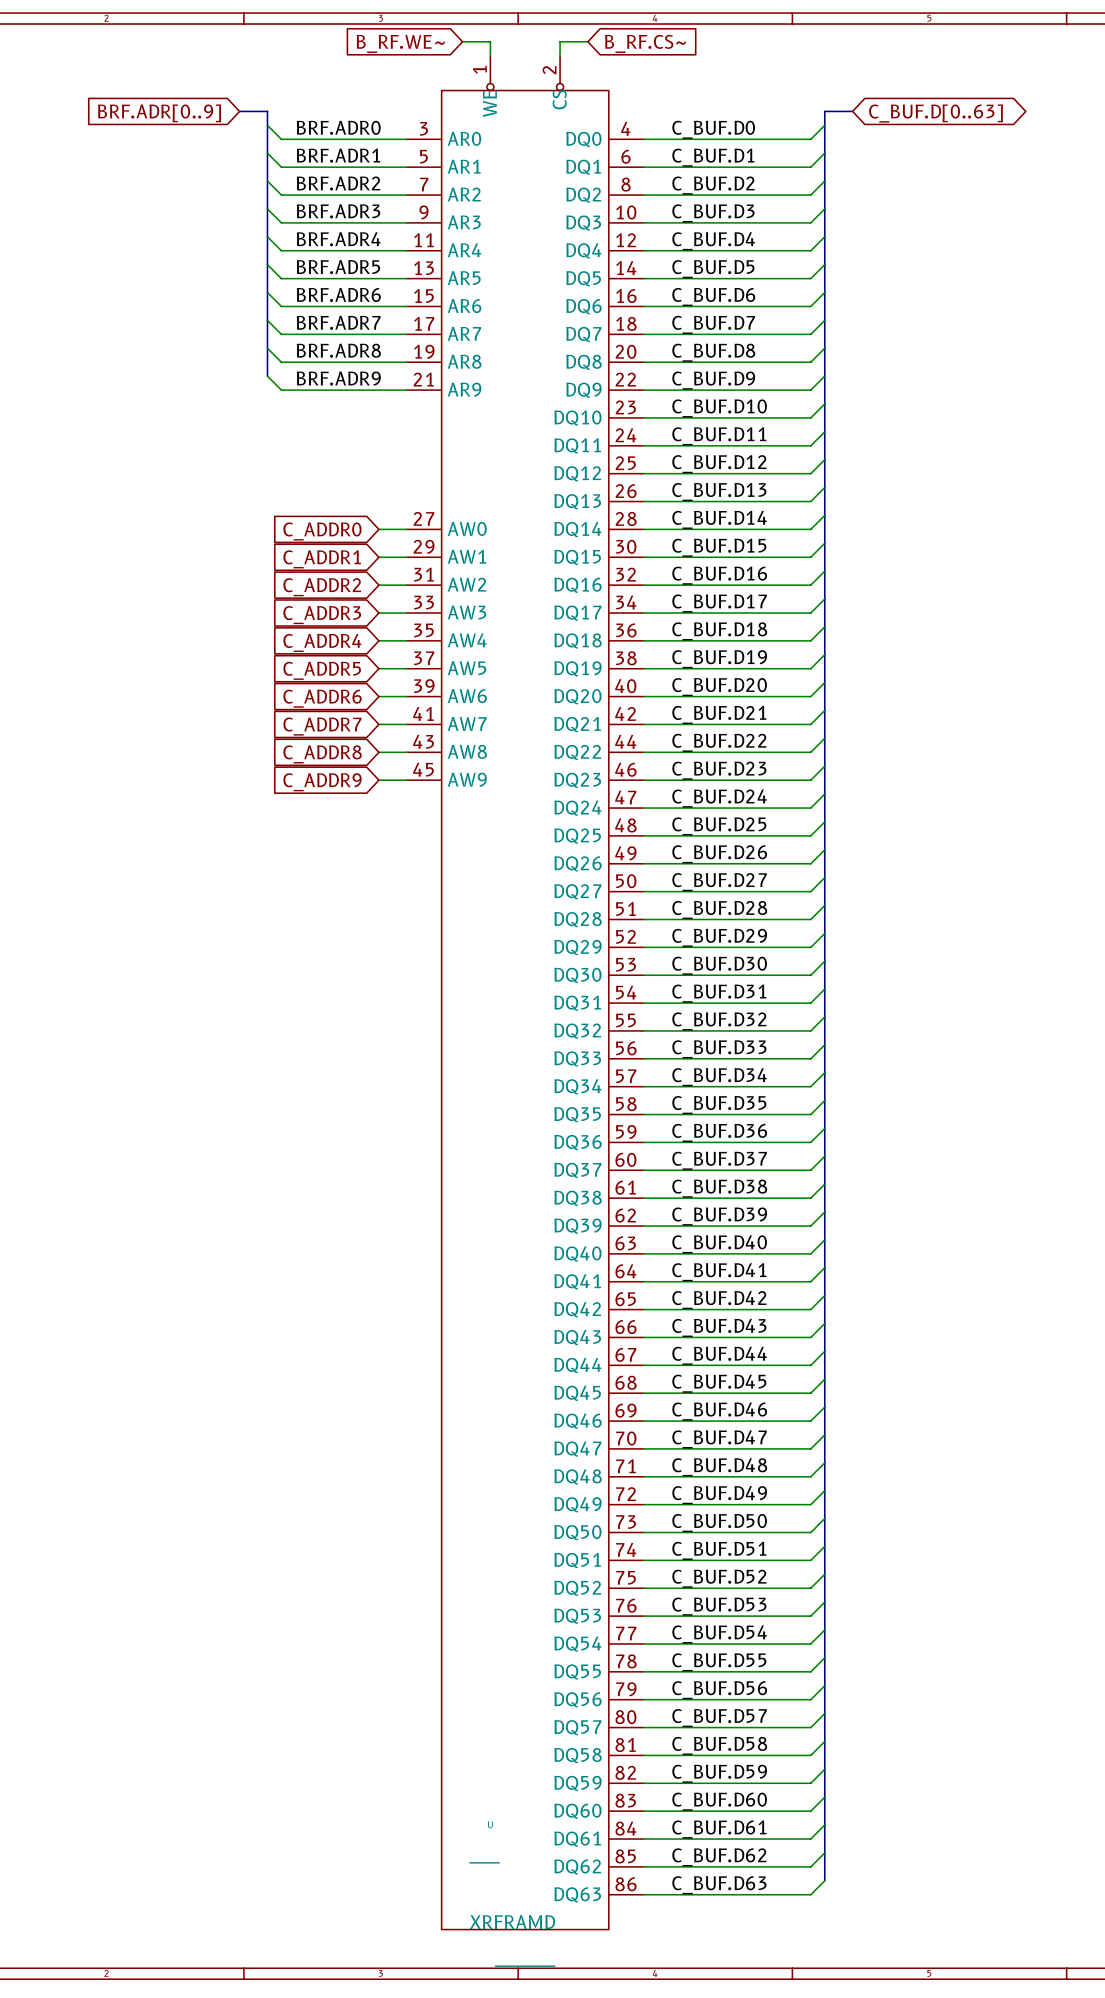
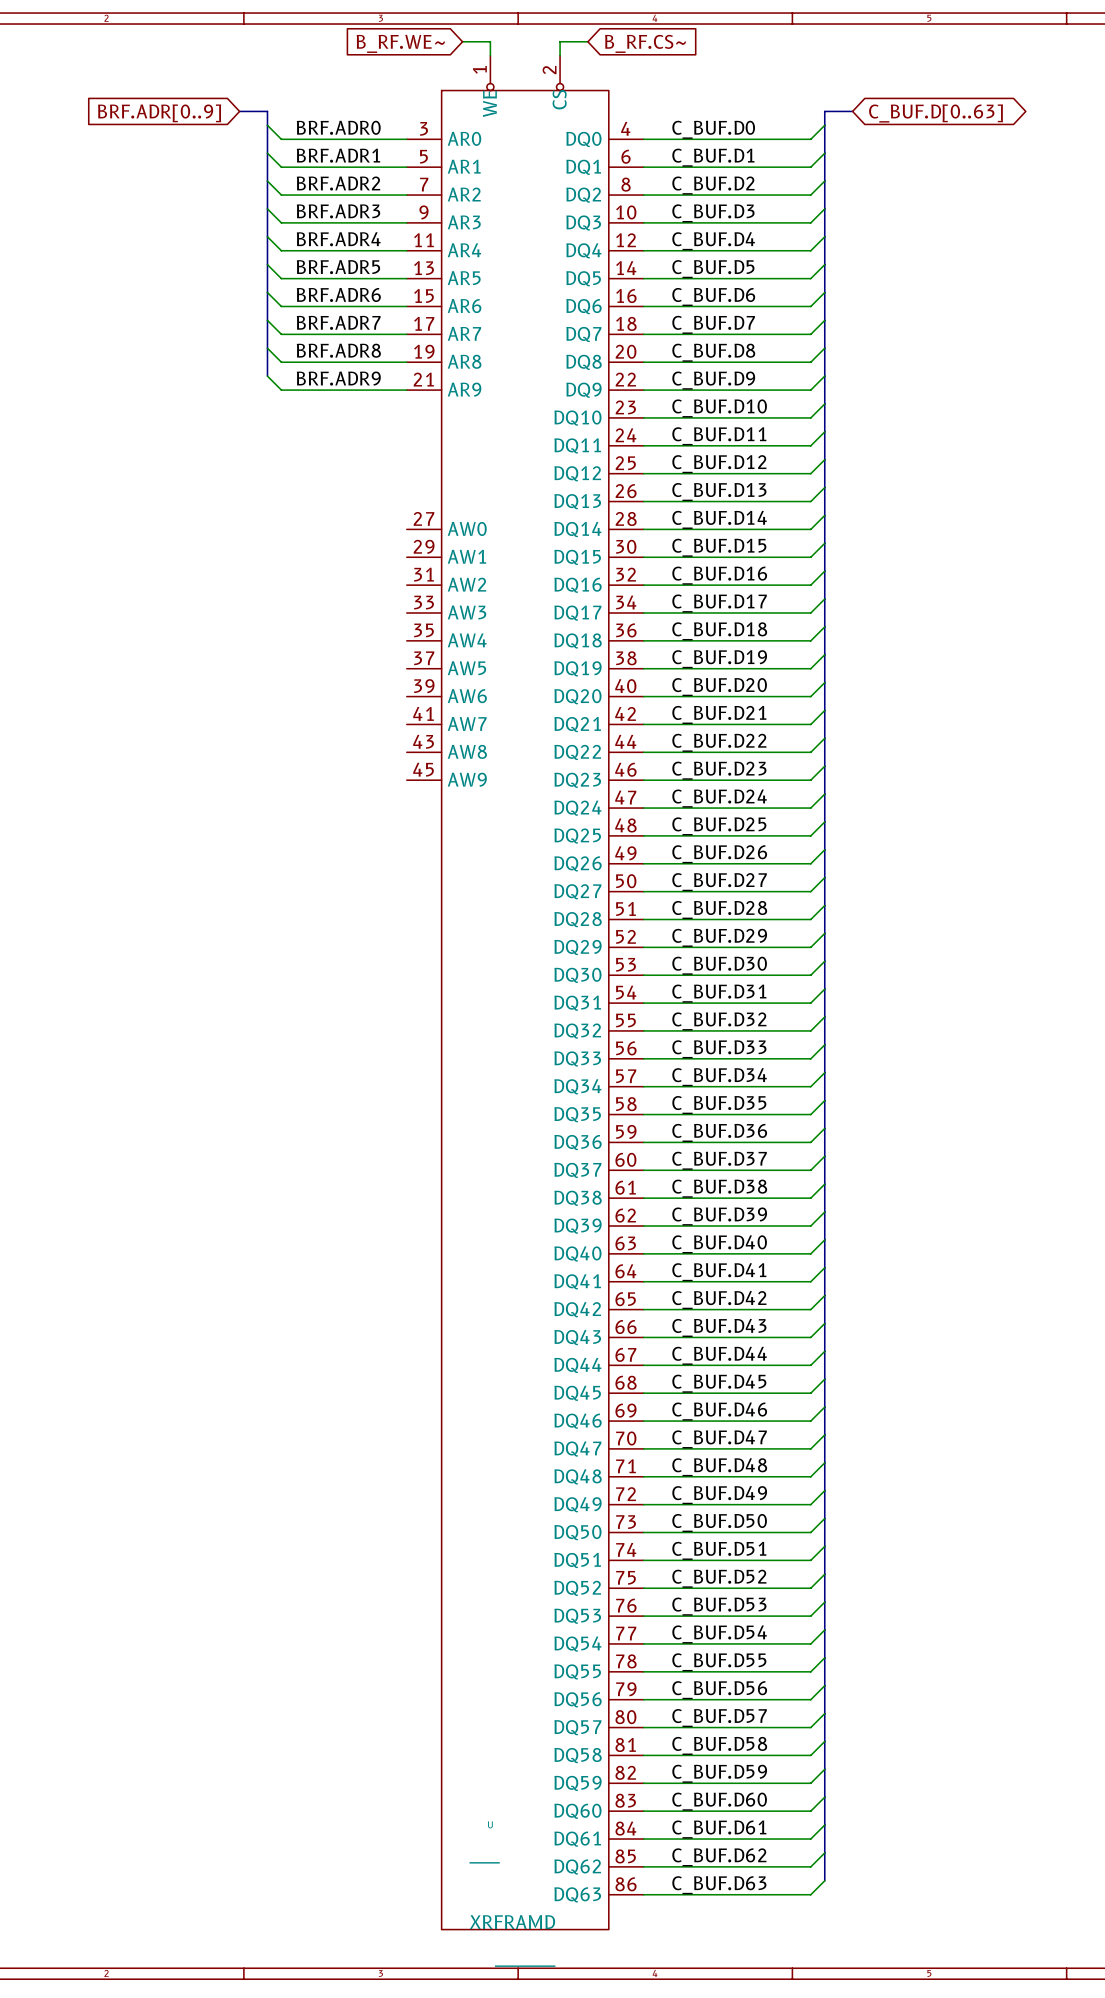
wire: (378, 529) (406, 529) -> none
global label: C_ADDR0 (322, 531) -> none
wire: (378, 557) (406, 557) -> none
global label: C_ADDR1 (322, 559) -> none
wire: (378, 585) (406, 585) -> none
global label: C_ADDR2 (322, 587) -> none
wire: (378, 612) (406, 612) -> none
global label: C_ADDR3 (322, 615) -> none
wire: (378, 640) (406, 640) -> none
global label: C_ADDR4 (322, 642) -> none
wire: (378, 668) (406, 668) -> none
global label: C_ADDR5 (322, 670) -> none
wire: (378, 696) (406, 696) -> none
global label: C_ADDR6 (322, 698) -> none
wire: (378, 724) (406, 724) -> none
global label: C_ADDR7 (322, 726) -> none
wire: (378, 752) (406, 752) -> none
global label: C_ADDR8 (322, 754) -> none
wire: (378, 780) (406, 780) -> none
global label: C_ADDR9 (322, 782) -> none

